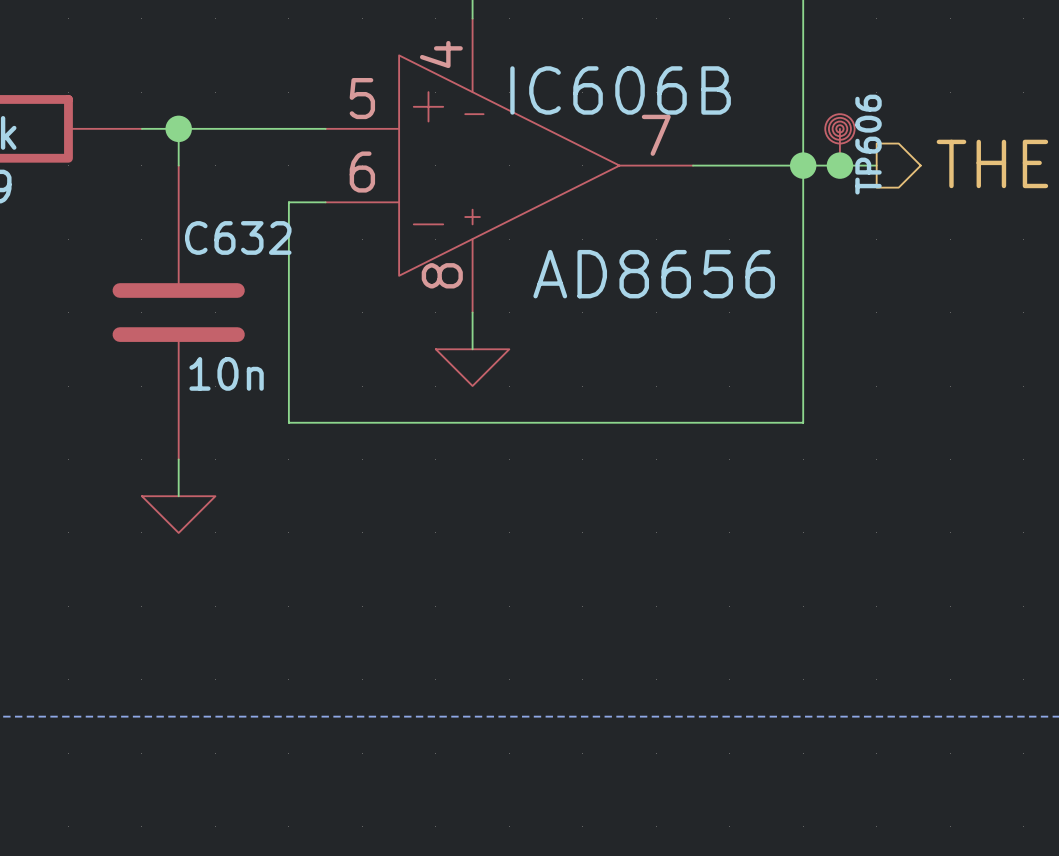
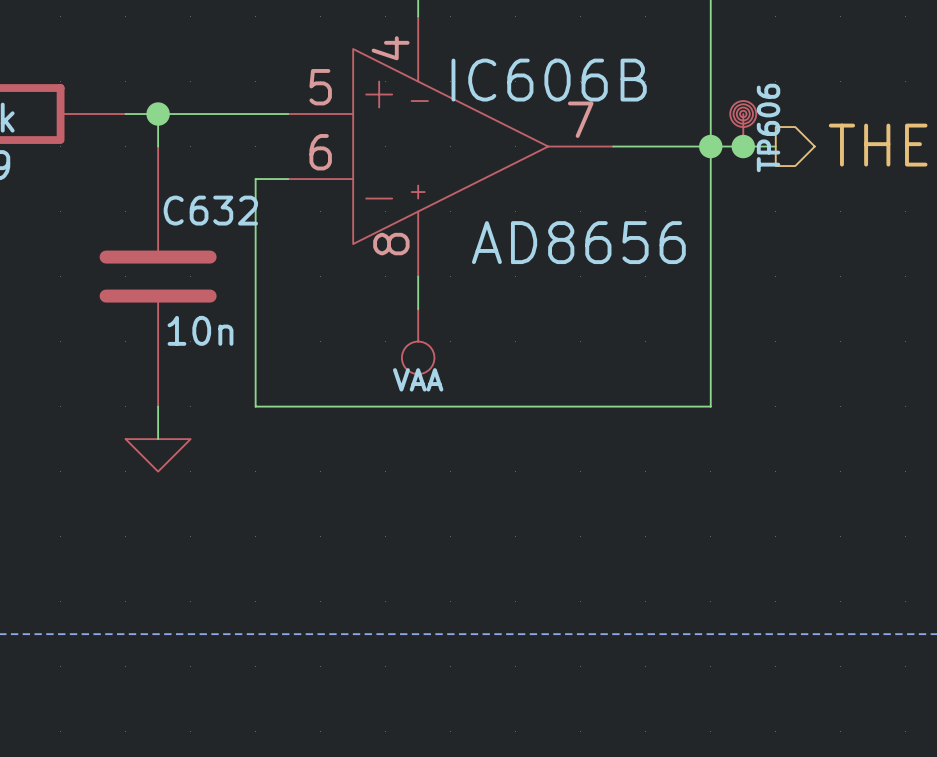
power symbol shape: [435, 349, 510, 387] -> [401, 309, 435, 375]
wire: (288, 422) (803, 422) -> (255, 374) (255, 406) (710, 406) (710, 374)
power symbol text: none -> VAA (418, 379)

